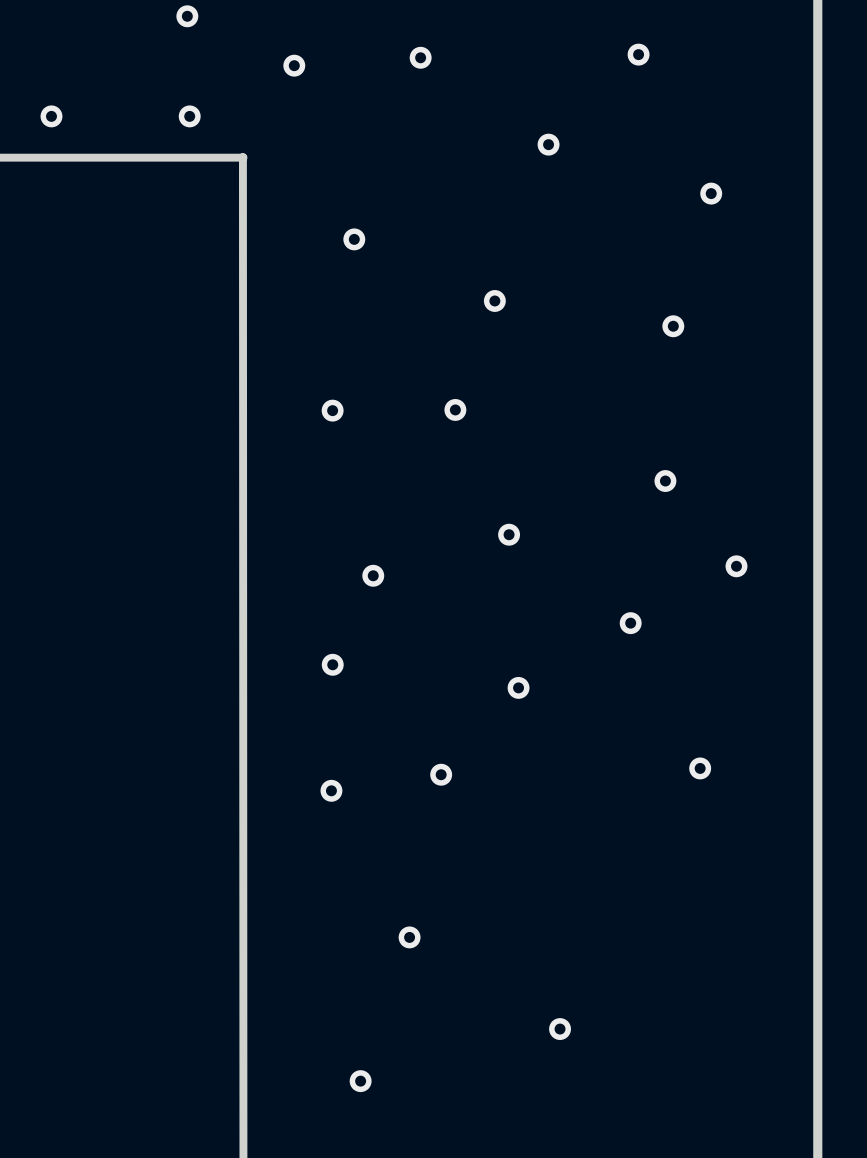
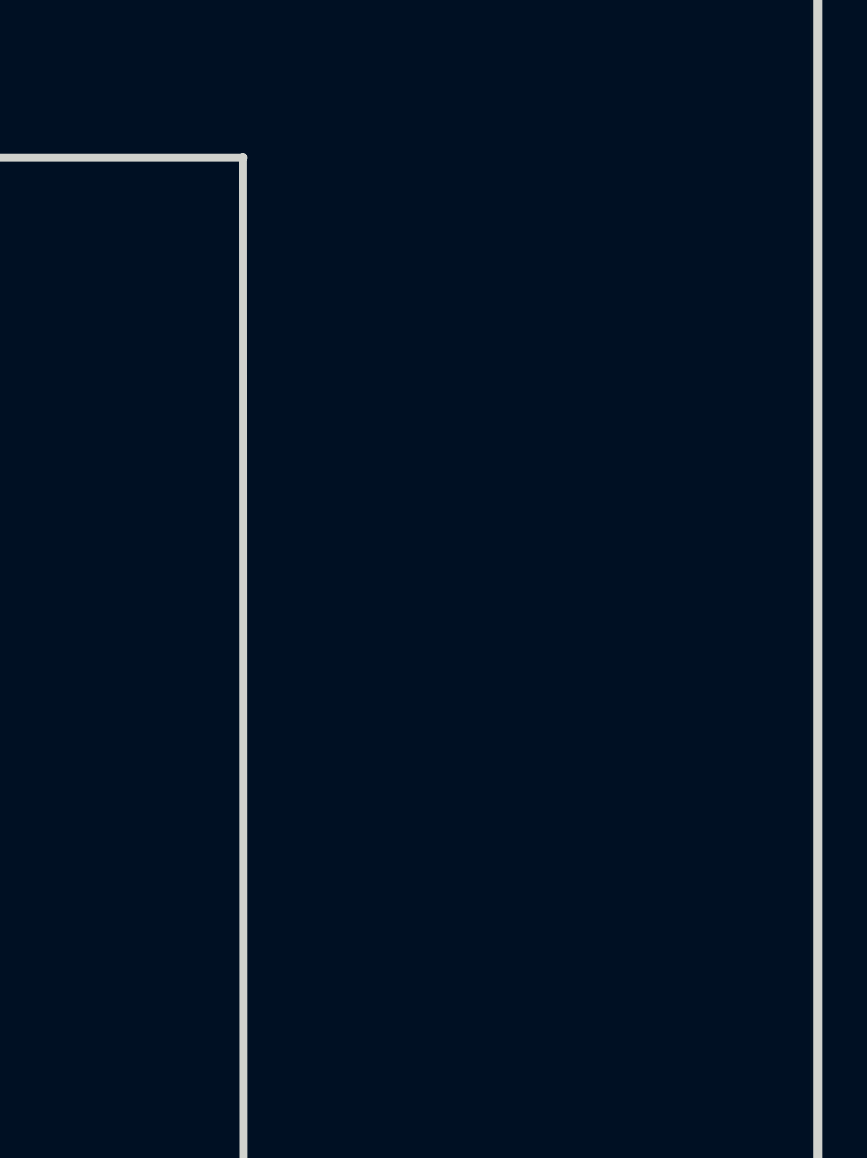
via: (187, 16) -> none
via: (638, 54) -> none
via: (420, 57) -> none
via: (294, 65) -> none
via: (51, 116) -> none
via: (189, 116) -> none
via: (548, 144) -> none
via: (711, 193) -> none
via: (354, 239) -> none
via: (494, 300) -> none
via: (673, 326) -> none
via: (455, 409) -> none
via: (332, 410) -> none
via: (665, 481) -> none
via: (509, 534) -> none
via: (736, 566) -> none
via: (373, 575) -> none
via: (630, 623) -> none
via: (332, 664) -> none
via: (518, 687) -> none
via: (700, 768) -> none
via: (441, 774) -> none
via: (331, 790) -> none
via: (409, 937) -> none
via: (560, 1029) -> none
via: (360, 1081) -> none

